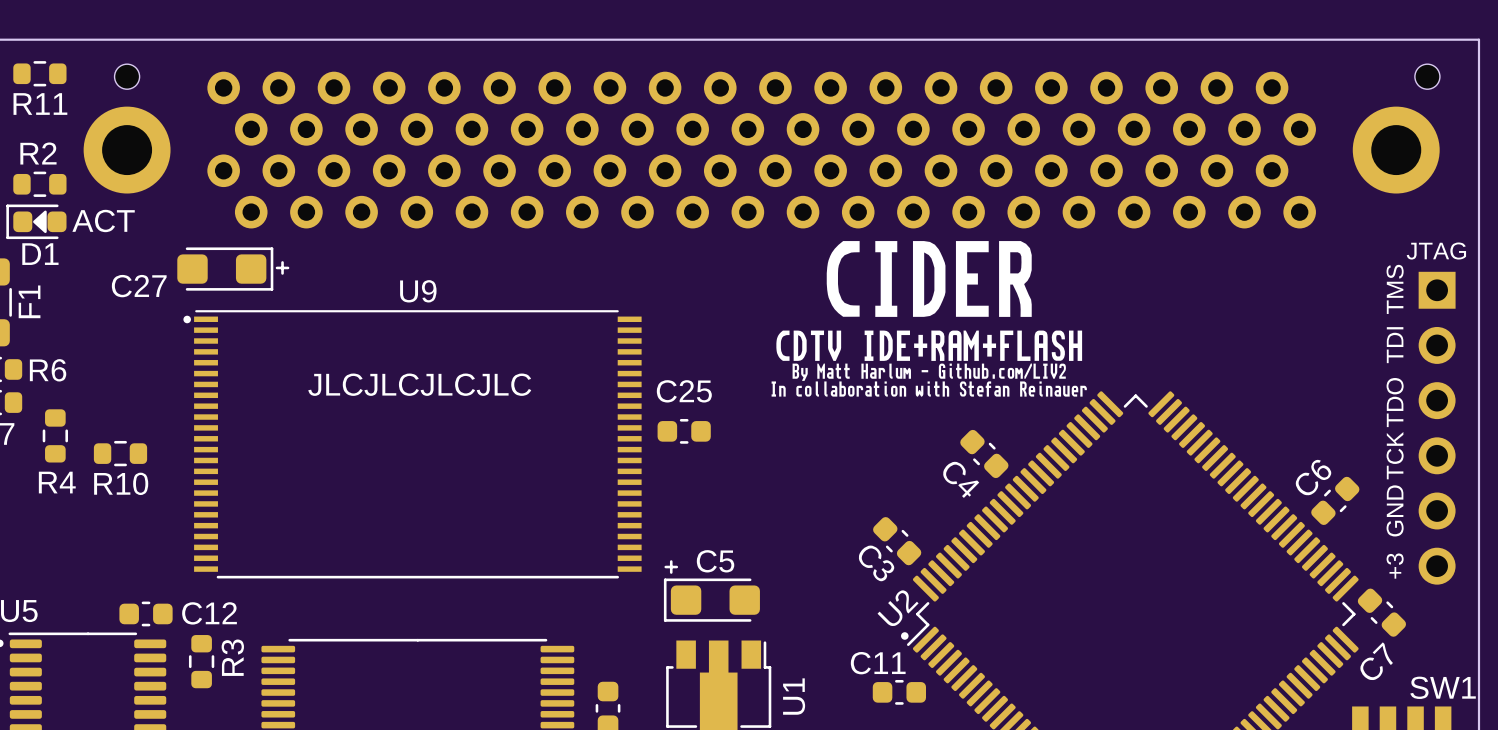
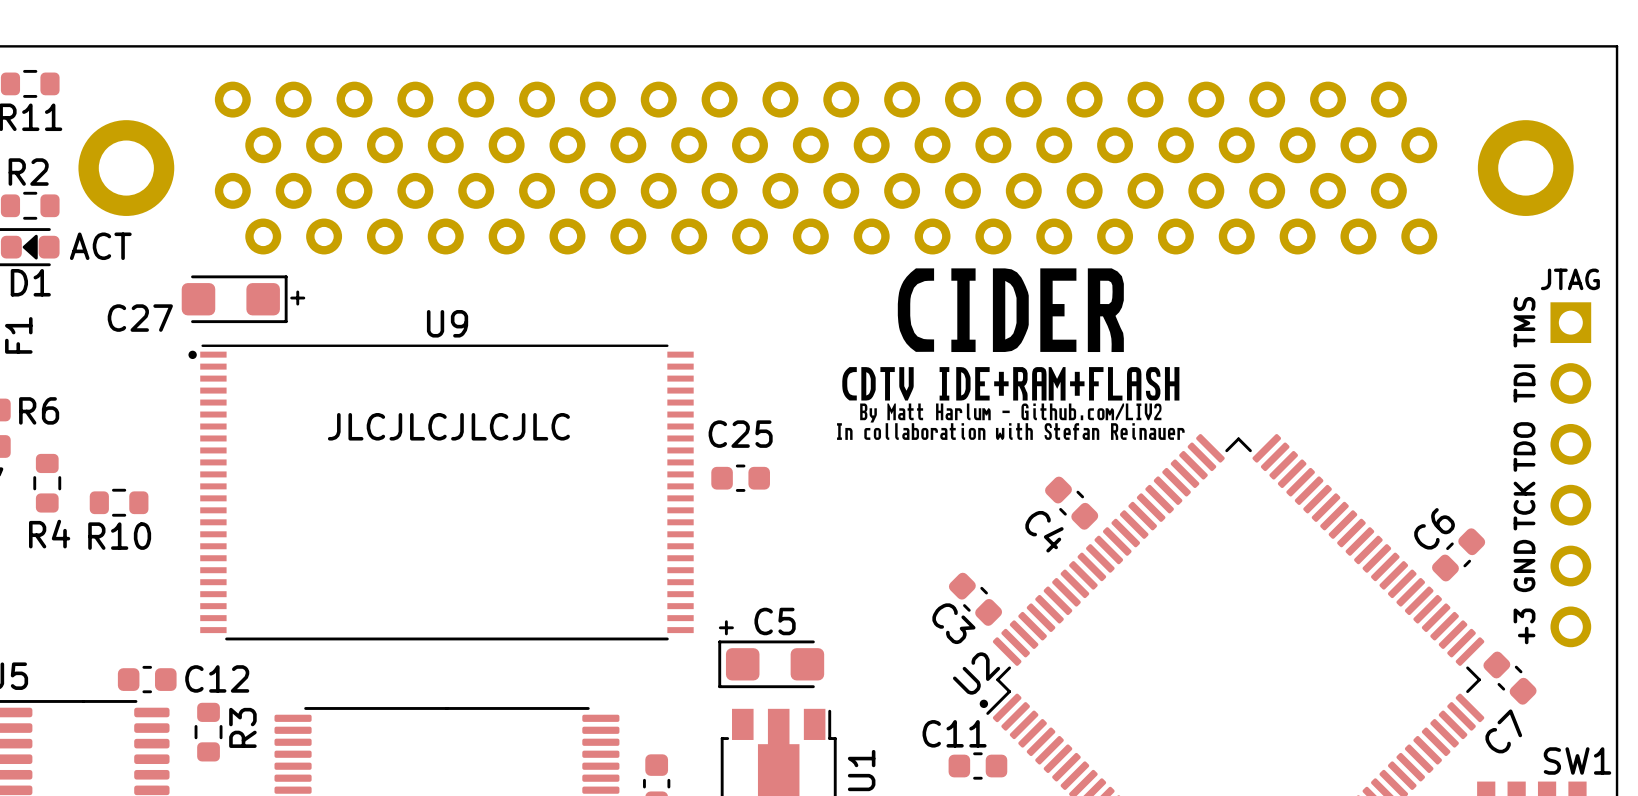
part: (127, 76) -> none
part: (1427, 76) -> none

